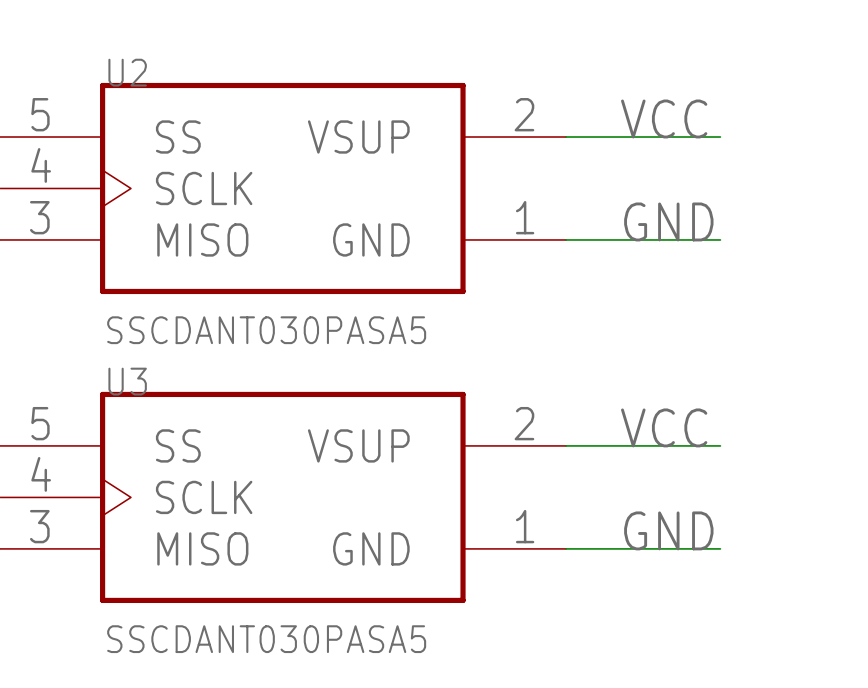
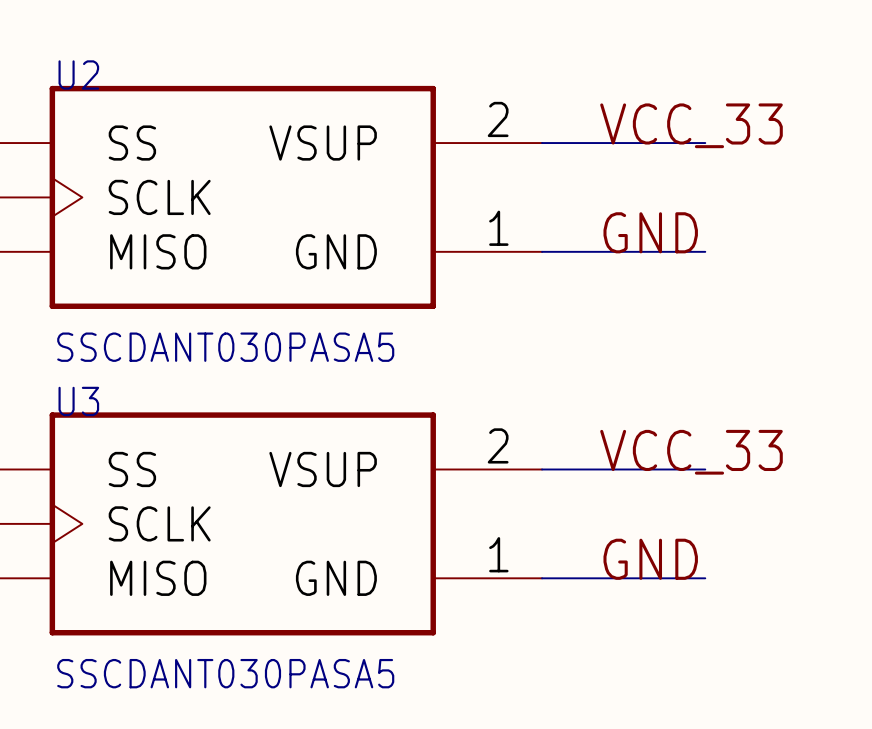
label: VCC (664, 118) -> VCC_33 (691, 125)
label: VCC (664, 427) -> VCC_33 (691, 452)

